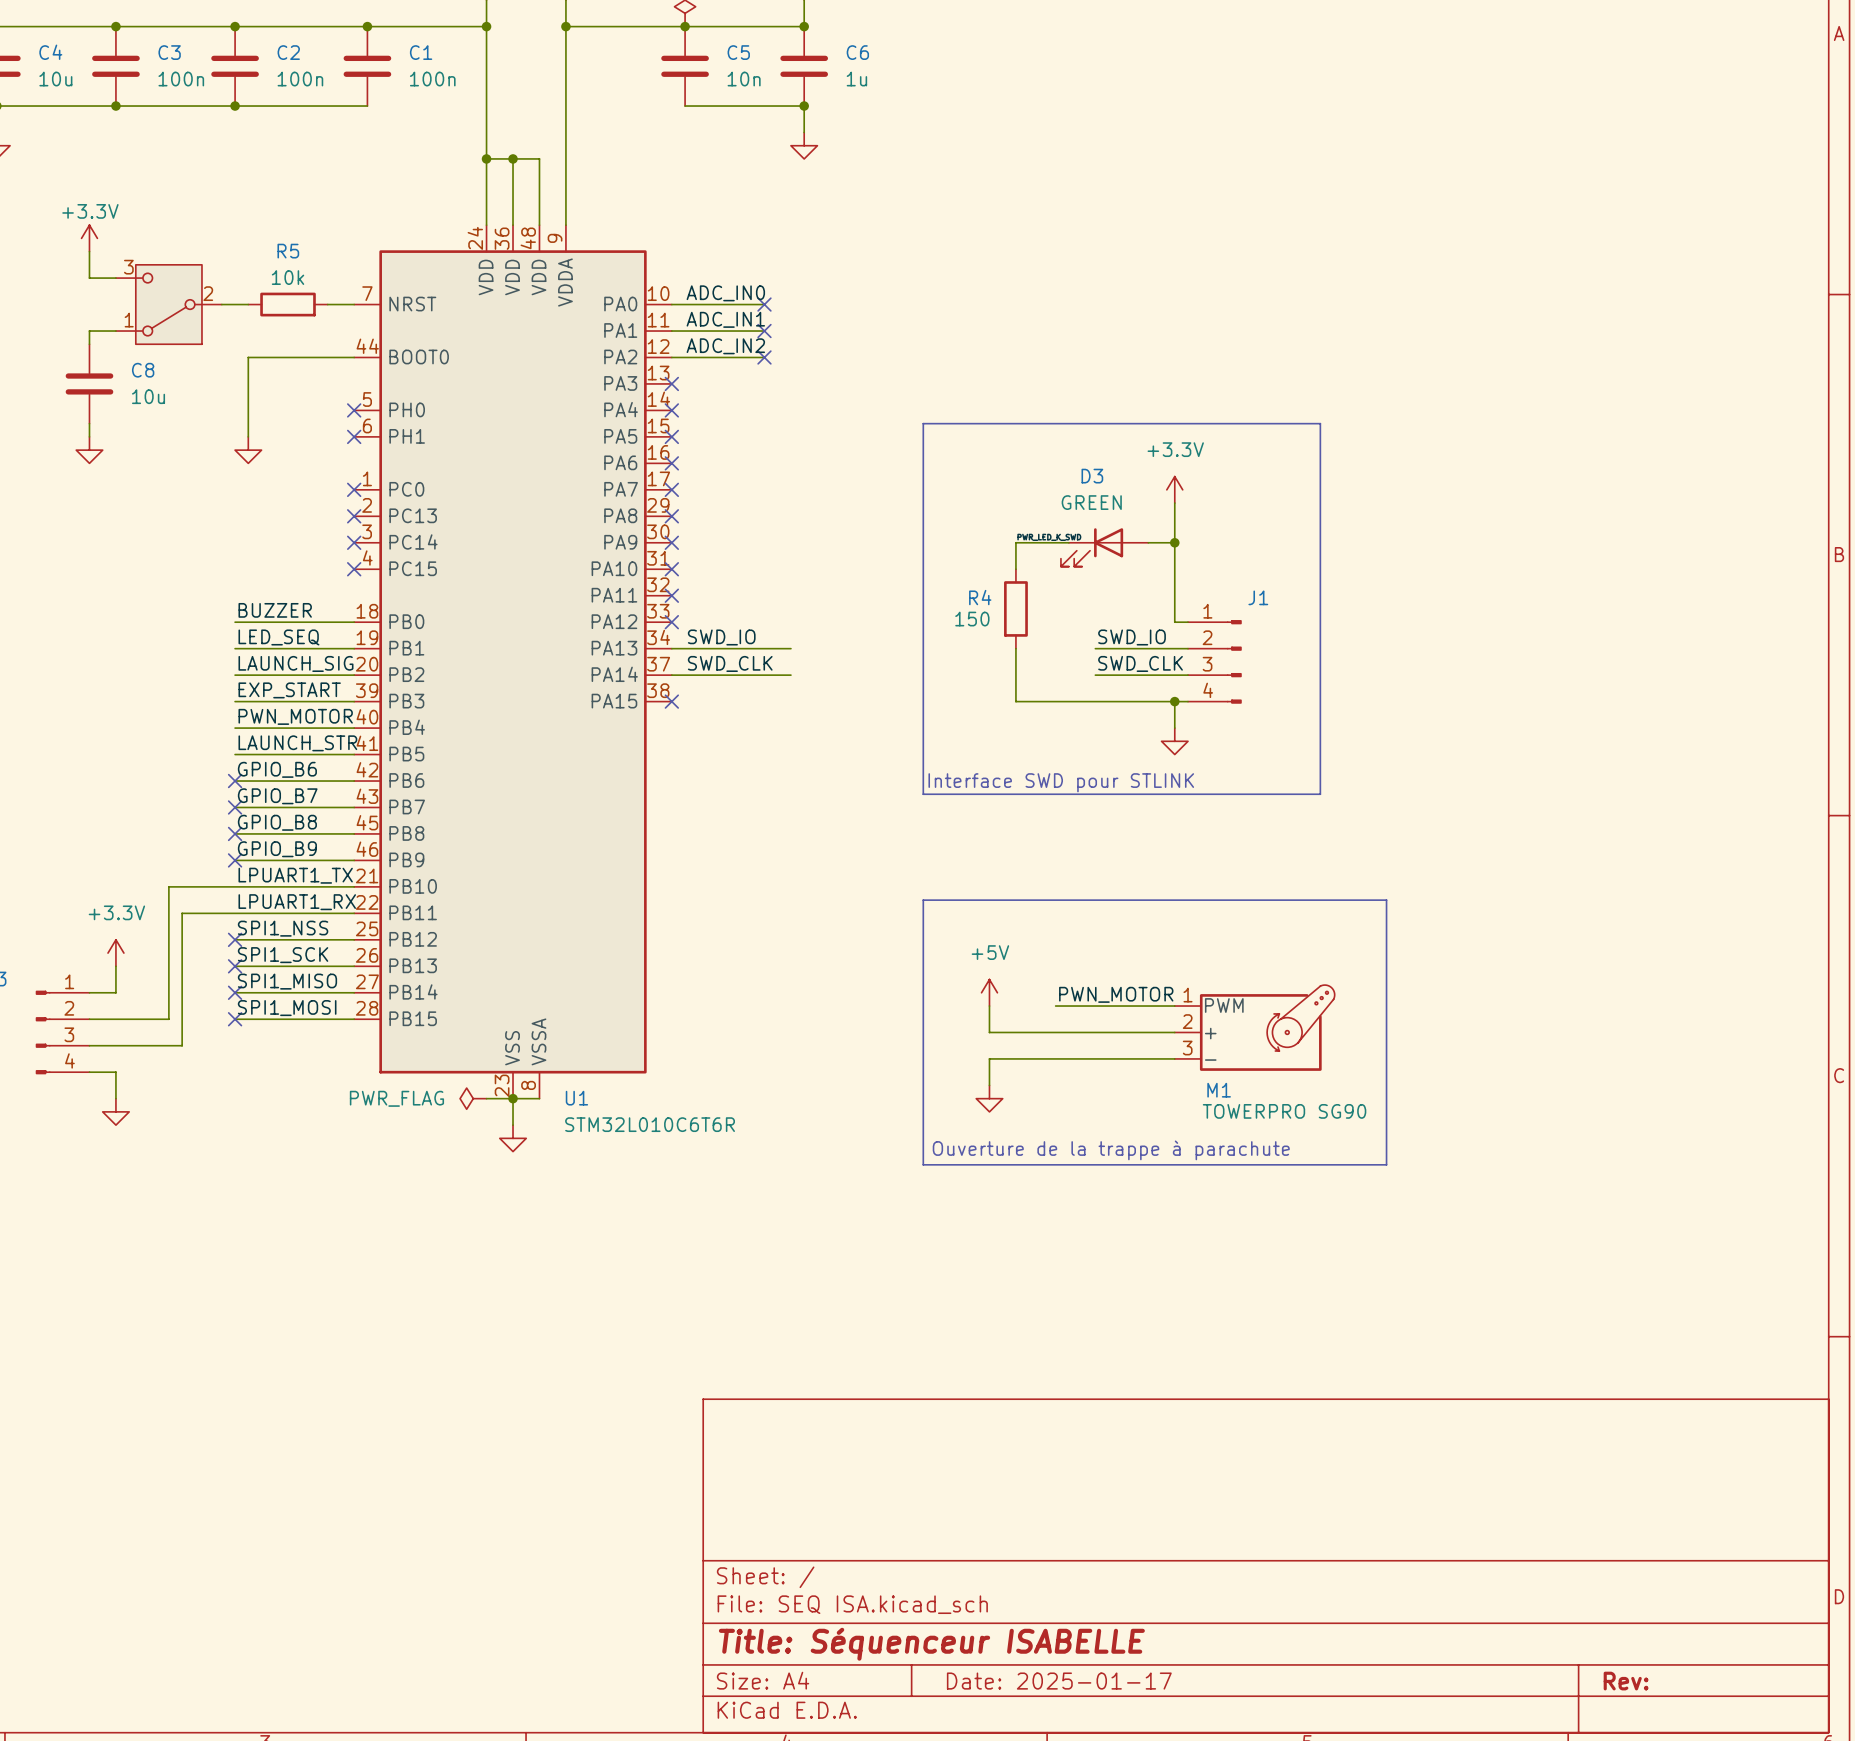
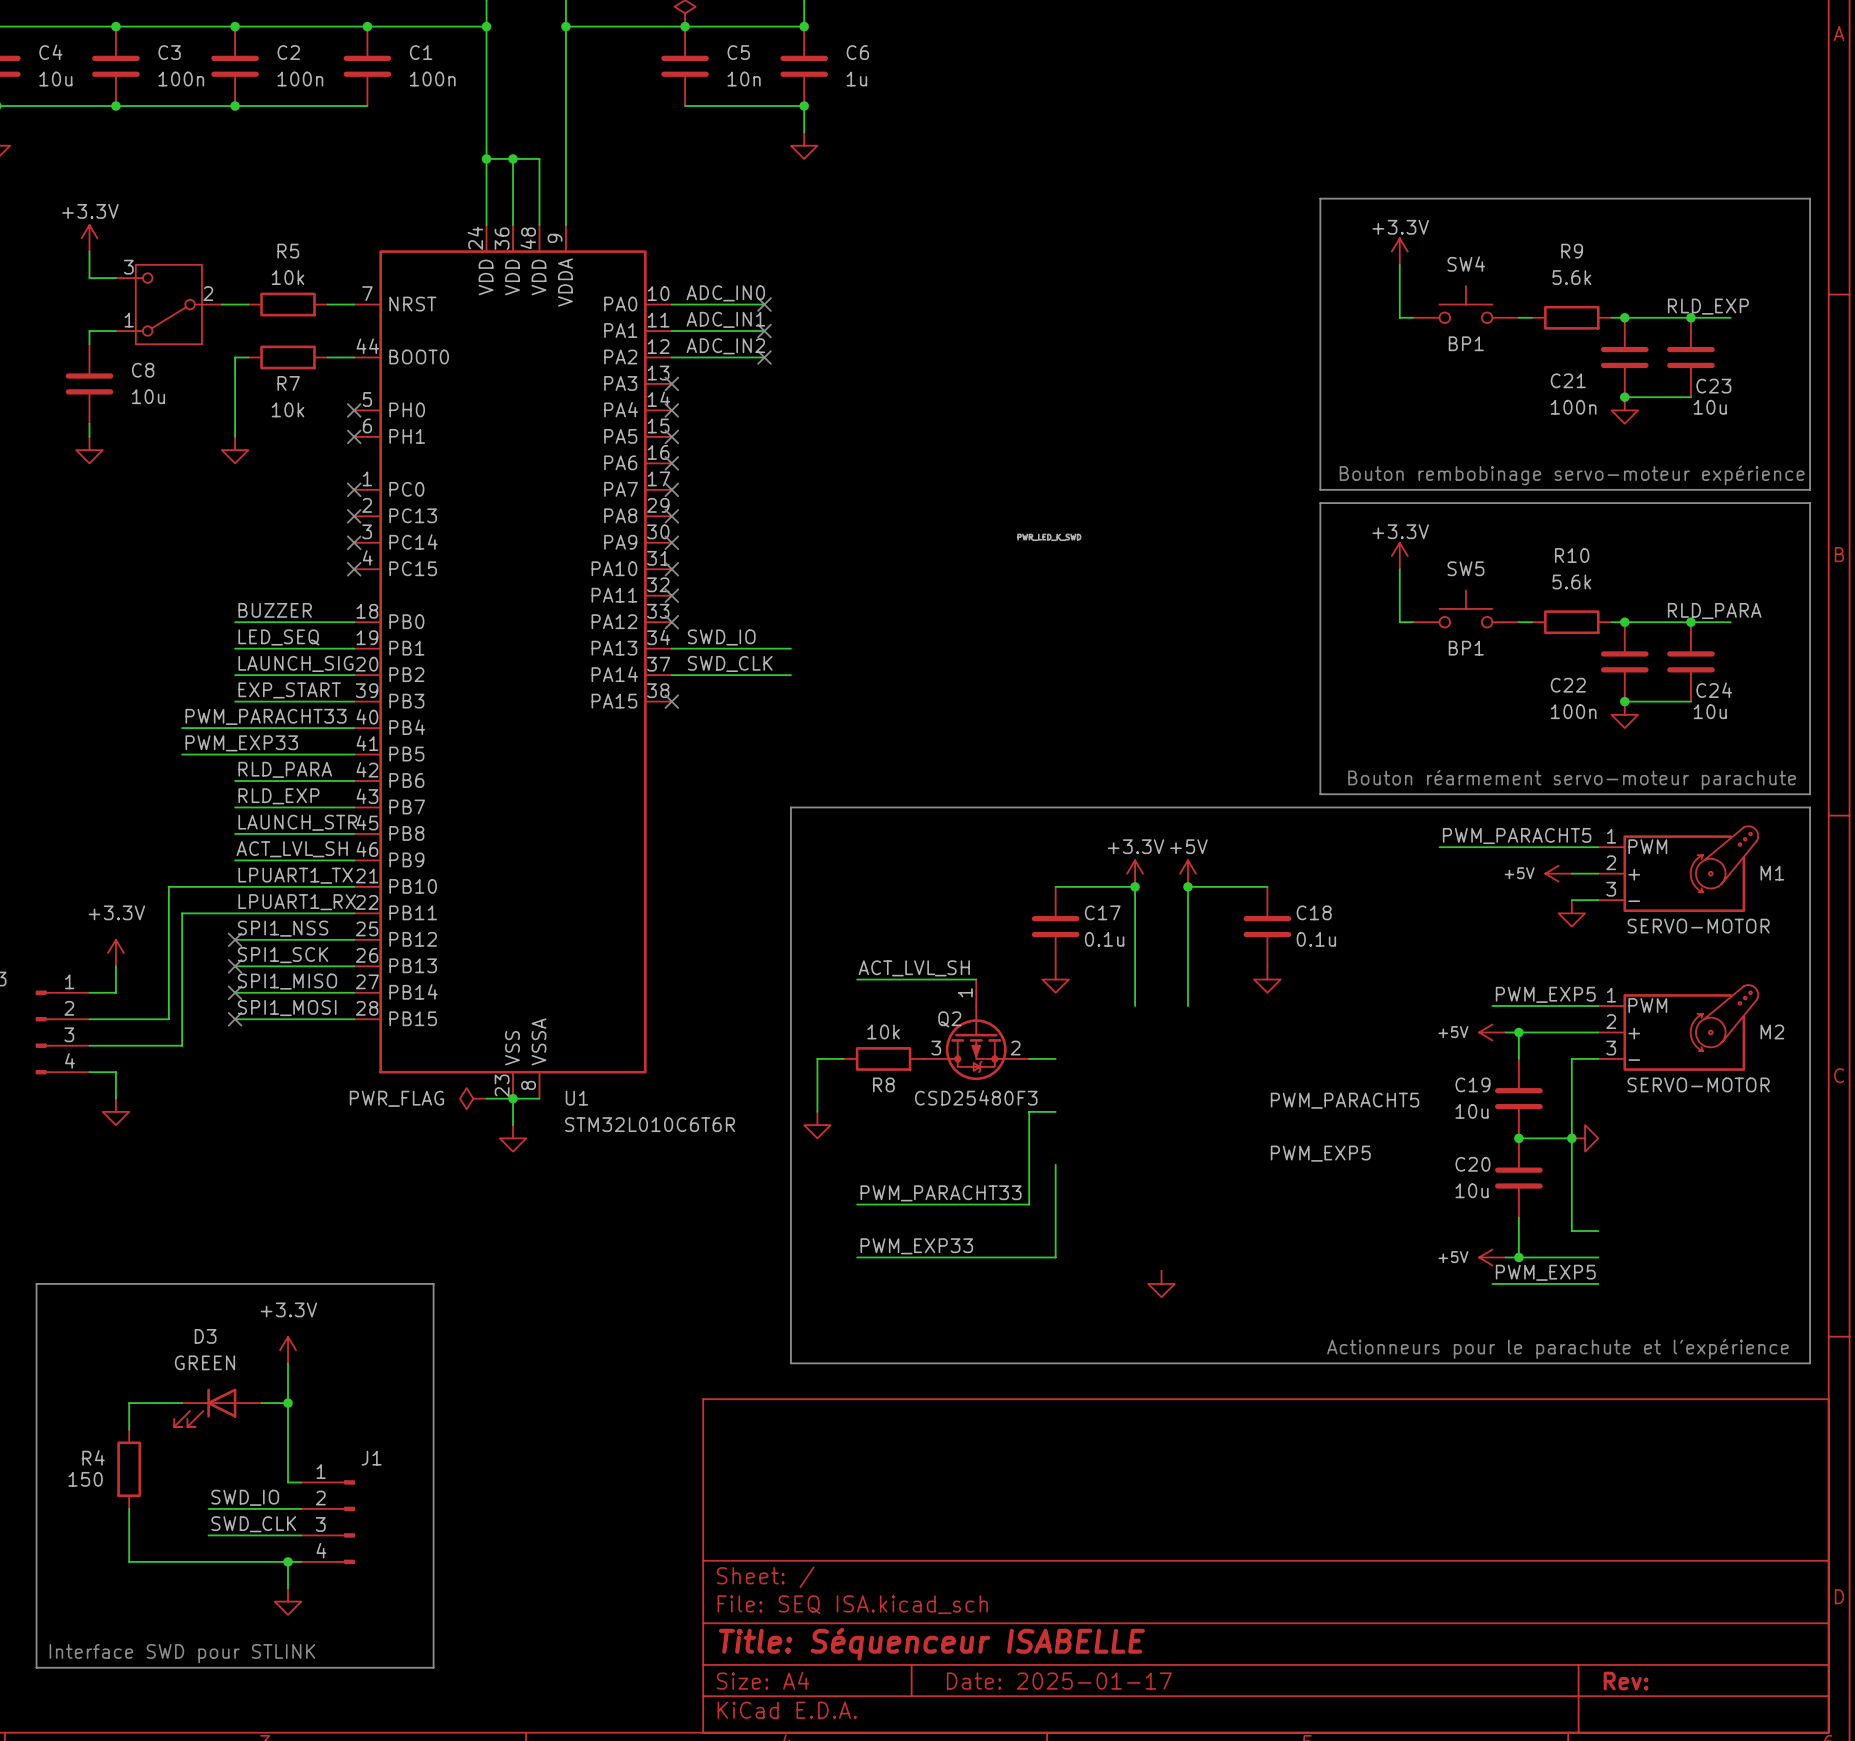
power symbol: none -> +3.3V (1399, 251)
wire: none -> (1399, 264) (1399, 317) (1413, 317)
SW4: none -> BP1 (1465, 304)
label: none -> RLD_EXP (1708, 306)
wire: none -> (1518, 317) (1532, 317)
R9: none -> 5.6k (1571, 317)
wire: none -> (1611, 317) (1730, 317)
junction: none -> (1624, 317)
junction: none -> (1690, 317)
wire: none -> (248, 357) (235, 357) (235, 436)
R7: none -> 10k (288, 357)
wire: (327, 357) (248, 357) (248, 436) -> none
C21: none -> 100n (1624, 357)
C23: none -> 10u (1690, 357)
wire: none -> (1624, 397) (1690, 397)
junction: none -> (1624, 397)
power symbol: none -> (1624, 410)
line: (1320, 423) (923, 423) (923, 794) (1320, 794) -> (1320, 503) (1810, 503) (1810, 794) (1320, 794)
power symbol position: (248, 450) -> (235, 450)
text: none -> Bouton rembobinage servo-moteur expérience (1572, 475)
power symbol: +3.3V (1174, 489) -> none
line: (1320, 489) (1320, 503) -> (1320, 489) (1810, 489) (1810, 198) (1320, 198) (1320, 423)
wire: (1174, 503) (1174, 622) (1188, 622) -> none
wire: (1068, 542) (1015, 542) (1015, 569) -> none
wire: (1148, 542) (1174, 542) -> none
junction: (1174, 542) -> none
D3 position: (1104, 547) -> (217, 1407)
power symbol: none -> +3.3V (1399, 556)
wire: none -> (1399, 569) (1399, 622) (1413, 622)
R4 position: (1015, 608) -> (129, 1469)
SW5: none -> BP1 (1465, 608)
label: none -> RLD_PARA (1714, 611)
wire: none -> (1518, 622) (1532, 622)
R10: none -> 5.6k (1571, 622)
wire: none -> (1611, 622) (1730, 622)
junction: none -> (1624, 622)
junction: none -> (1690, 622)
label: SWD_IO (1132, 637) -> none
wire: (1015, 648) (1015, 701) (1188, 701) -> none
wire: (1095, 648) (1188, 648) -> none
J1 position: (1214, 661) -> (328, 1522)
C22: none -> 100n (1624, 661)
C24: none -> 10u (1690, 661)
label: SWD_CLK (1140, 663) -> none
wire: (1095, 675) (1188, 675) -> none
wire: (1174, 701) (1174, 728) -> none
junction: (1174, 701) -> none
wire: none -> (1624, 701) (1690, 701)
junction: none -> (1624, 701)
power symbol: none -> (1624, 714)
label: none -> PWM_PARACHT33 (266, 716)
label: PWN_MOTOR (295, 716) -> none
wire: none -> (182, 728) (235, 728)
power symbol: (1174, 741) -> none
label: none -> PWM_EXP33 (241, 743)
label: LAUNCH_STR (297, 743) -> none
wire: none -> (182, 754) (235, 754)
label: GPIO_B6 (277, 769) -> RLD_PARA (285, 769)
text: none -> Bouton réarmement servo-moteur parachute (1572, 779)
no-connect mark: (235, 781) -> none
text: Interface SWD pour STLINK (1061, 782) -> none
label: GPIO_B7 (277, 796) -> RLD_EXP (278, 796)
no-connect mark: (235, 807) -> none
line: none -> (790, 807) (1810, 807) (1810, 1363) (790, 1363) (790, 807)
label: GPIO_B8 (277, 822) -> LAUNCH_STR (297, 822)
no-connect mark: (235, 833) -> none
label: none -> PWM_PARACHT5 (1517, 836)
wire: none -> (1439, 847) (1598, 847)
label: GPIO_B9 (277, 849) -> ACT_LVL_SH (292, 849)
no-connect mark: (235, 860) -> none
power symbol: none -> +3.3V (1135, 873)
power symbol: none -> +5V (1558, 873)
wire: none -> (1571, 873) (1598, 873)
wire: none -> (1055, 886) (1135, 886) (1135, 1006)
junction: none -> (1135, 886)
junction: none -> (1188, 886)
wire: none -> (1267, 886) (1188, 886) (1188, 1006)
line: (923, 900) (923, 1164) (1386, 1164) (1386, 900) (923, 900) -> none
wire: none -> (1571, 900) (1598, 900)
power symbol: none -> (1571, 913)
C17: none -> 0.1u (1055, 926)
C18: none -> 0.1u (1267, 926)
power symbol text position: +5V (990, 952) -> +5V (1188, 846)
label: none -> ACT_LVL_SH (914, 968)
power symbol: none -> (1055, 979)
power symbol: none -> (1267, 979)
power symbol position: +5V (989, 992) -> +5V (1188, 873)
label: PWN_MOTOR (1116, 994) -> none
label: none -> PWM_EXP5 (1545, 994)
wire: (989, 1006) (989, 1032) (1174, 1032) -> none
wire: (1055, 1006) (1174, 1006) -> (857, 979) (976, 979)
wire: none -> (1492, 1006) (1598, 1006)
M1 position: (1254, 1027) -> (1678, 869)
M2: none -> SERVO-MOTOR (1678, 1027)
Q2: none -> CSD25480F3 (976, 1029)
power symbol: none -> +5V (1492, 1032)
wire: none -> (1505, 1032) (1598, 1032)
wire: none -> (1518, 1032) (1518, 1058)
junction: none -> (1518, 1032)
wire: none -> (843, 1058) (817, 1058) (817, 1111)
R8: none -> 10k (883, 1058)
wire: (1055, 1058) (1174, 1058) -> none
wire: none -> (1598, 1058) (1571, 1058) (1571, 1231) (1598, 1231)
M1 name position: M1 (1219, 1090) -> M1 (1772, 873)
power symbol: (989, 1098) -> none
C19: none -> 10u (1518, 1098)
label: none -> PWM_PARACHT5 (1345, 1100)
wire: none -> (1055, 1111) (1029, 1111) (1029, 1204) (857, 1204)
M1 value: TOWERPRO SG90 (1284, 1111) -> SERVO-MOTOR (1698, 926)
power symbol: none -> (817, 1125)
wire: none -> (1518, 1138) (1571, 1138)
junction: none -> (1518, 1138)
junction: none -> (1571, 1138)
power symbol: none -> (1585, 1138)
text: Ouverture de la trappe à parachute (1111, 1150) -> none
label: none -> PWM_EXP5 (1320, 1153)
wire: none -> (1055, 1164) (1055, 1257) (857, 1257)
C20: none -> 10u (1518, 1178)
label: none -> PWM_PARACHT33 (941, 1193)
wire: none -> (1518, 1217) (1518, 1257)
label: none -> PWM_EXP33 (916, 1246)
power symbol: none -> +5V (1492, 1257)
wire: none -> (1505, 1257) (1598, 1257)
junction: none -> (1518, 1257)
label: none -> PWM_EXP5 (1545, 1272)
line: none -> (36, 1283) (433, 1283) (433, 1667) (36, 1667) (36, 1283)
power symbol: none -> (1161, 1283)
wire: none -> (1492, 1283) (1598, 1283)
text: none -> Actionneurs pour le parachute et l'expérience (1557, 1348)
power symbol: none -> +3.3V (288, 1350)
wire: none -> (288, 1363) (288, 1482) (301, 1482)
wire: none -> (182, 1403) (129, 1403) (129, 1429)
wire: none -> (261, 1403) (288, 1403)
junction: none -> (288, 1403)
label: none -> SWD_IO (245, 1497)
wire: none -> (129, 1508) (129, 1561) (301, 1561)
wire: none -> (208, 1508) (301, 1508)
label: none -> SWD_CLK (253, 1524)
wire: none -> (208, 1535) (301, 1535)
wire: none -> (288, 1561) (288, 1588)
junction: none -> (288, 1561)
power symbol: none -> (288, 1601)
text: none -> Interface SWD pour STLINK (182, 1653)

